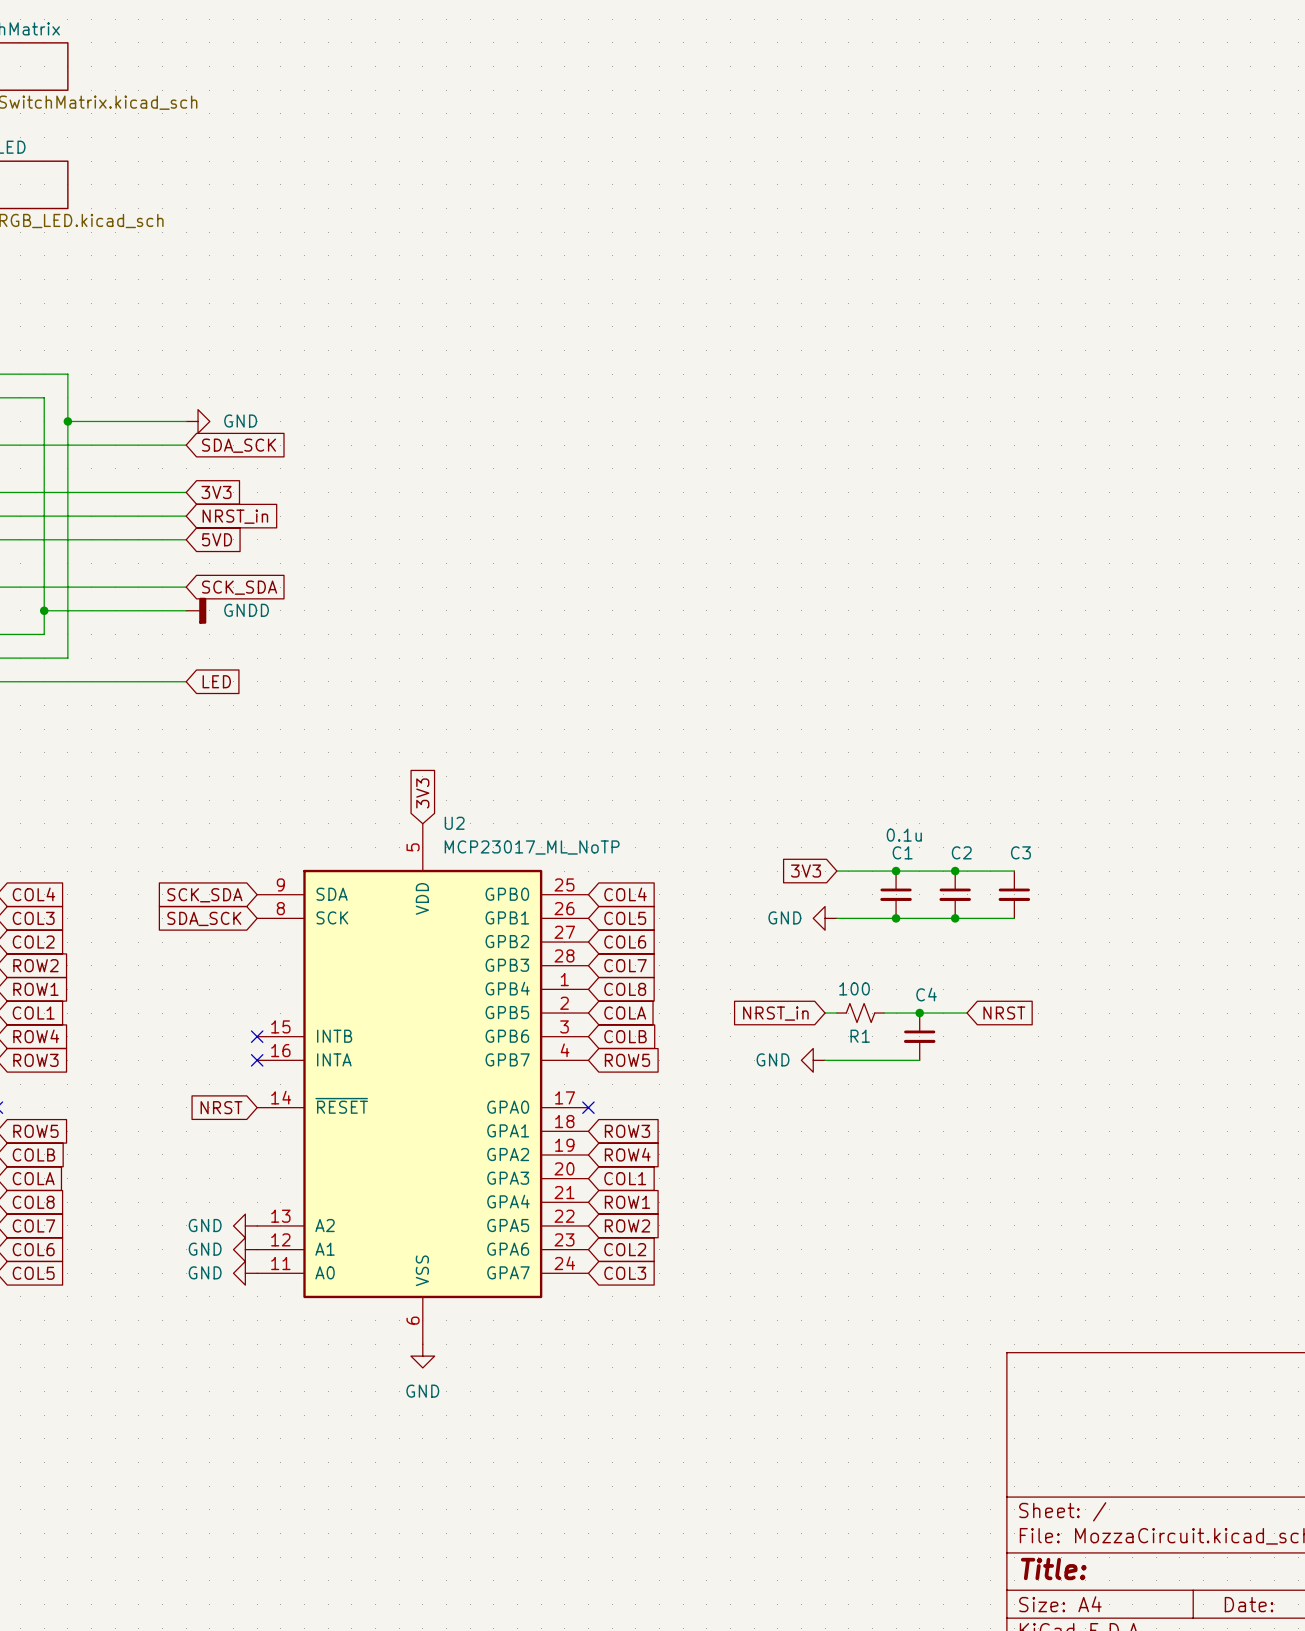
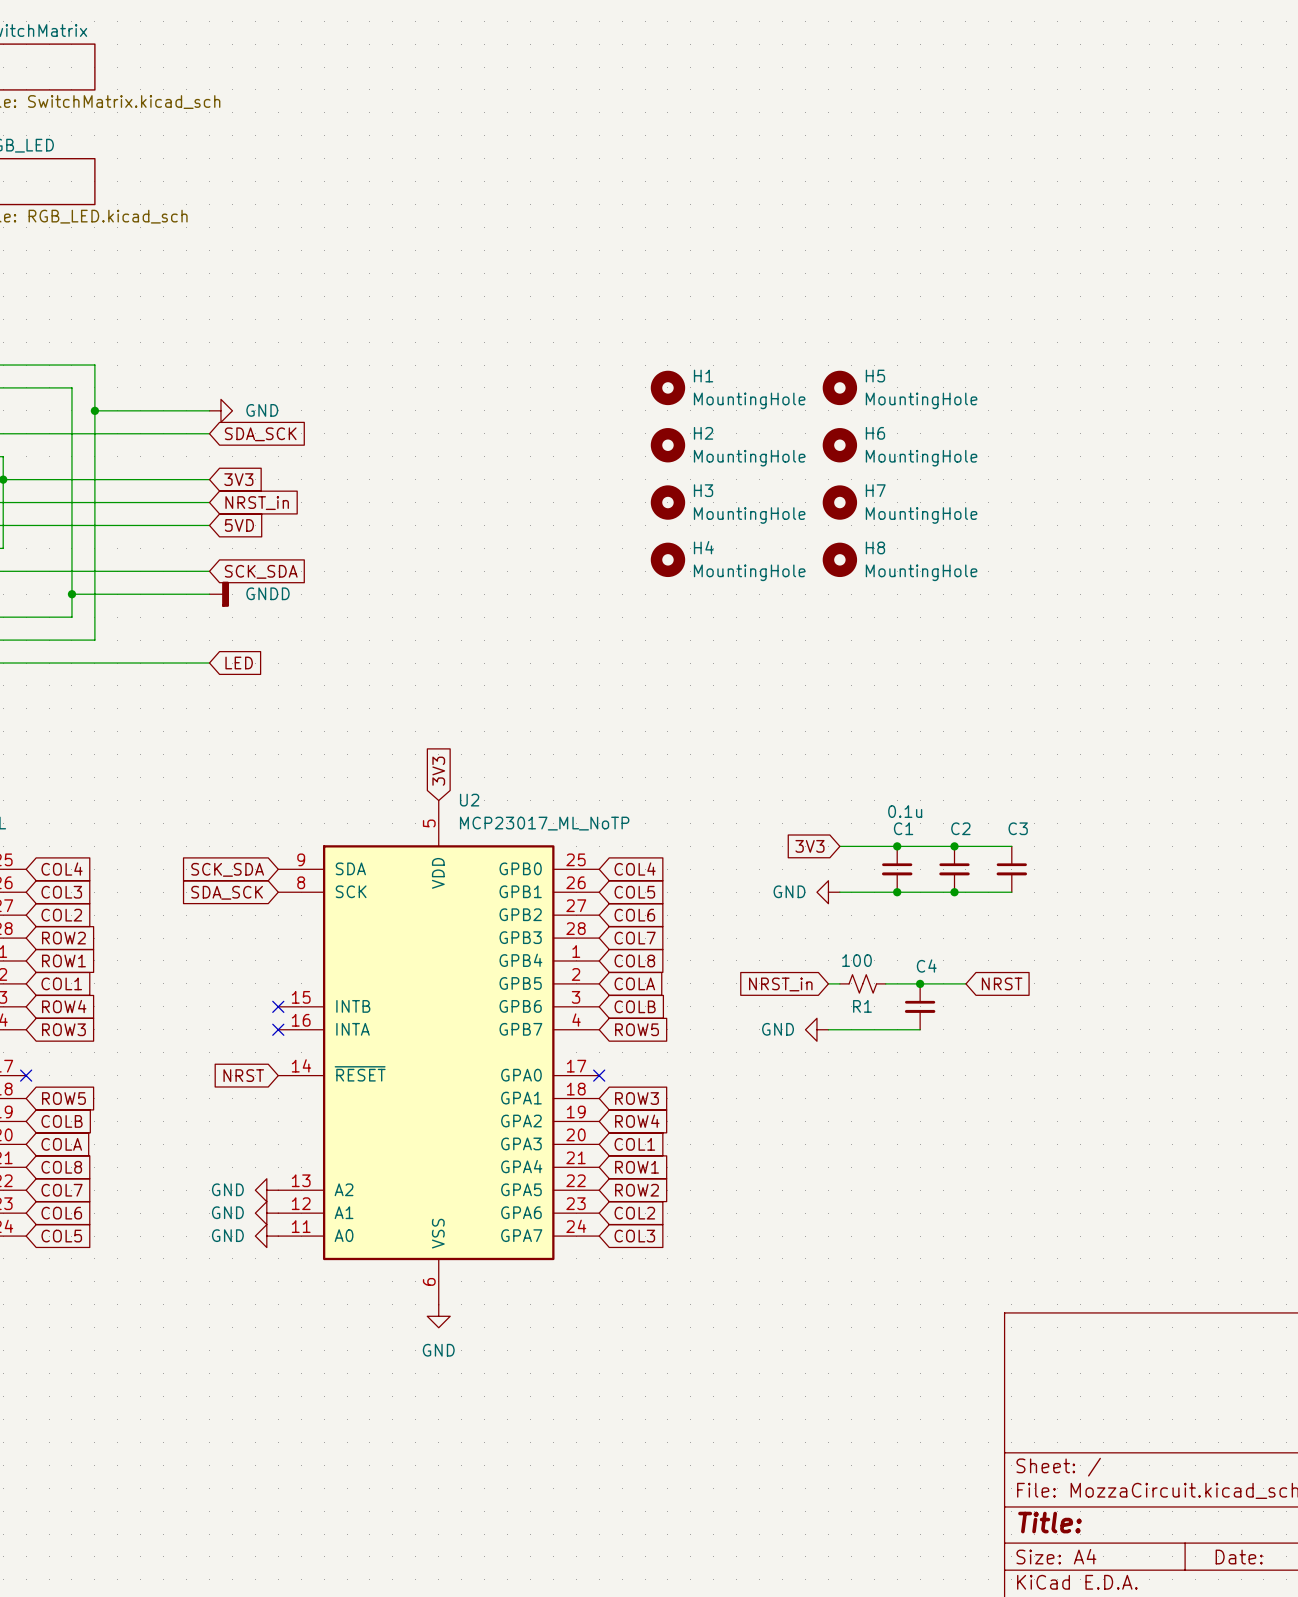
H1: none -> MountingHole (667, 387)
H5: none -> MountingHole (839, 387)
H2: none -> MountingHole (667, 445)
H6: none -> MountingHole (839, 445)
H3: none -> MountingHole (667, 502)
H7: none -> MountingHole (839, 502)
H4: none -> MountingHole (667, 559)
H8: none -> MountingHole (839, 559)

